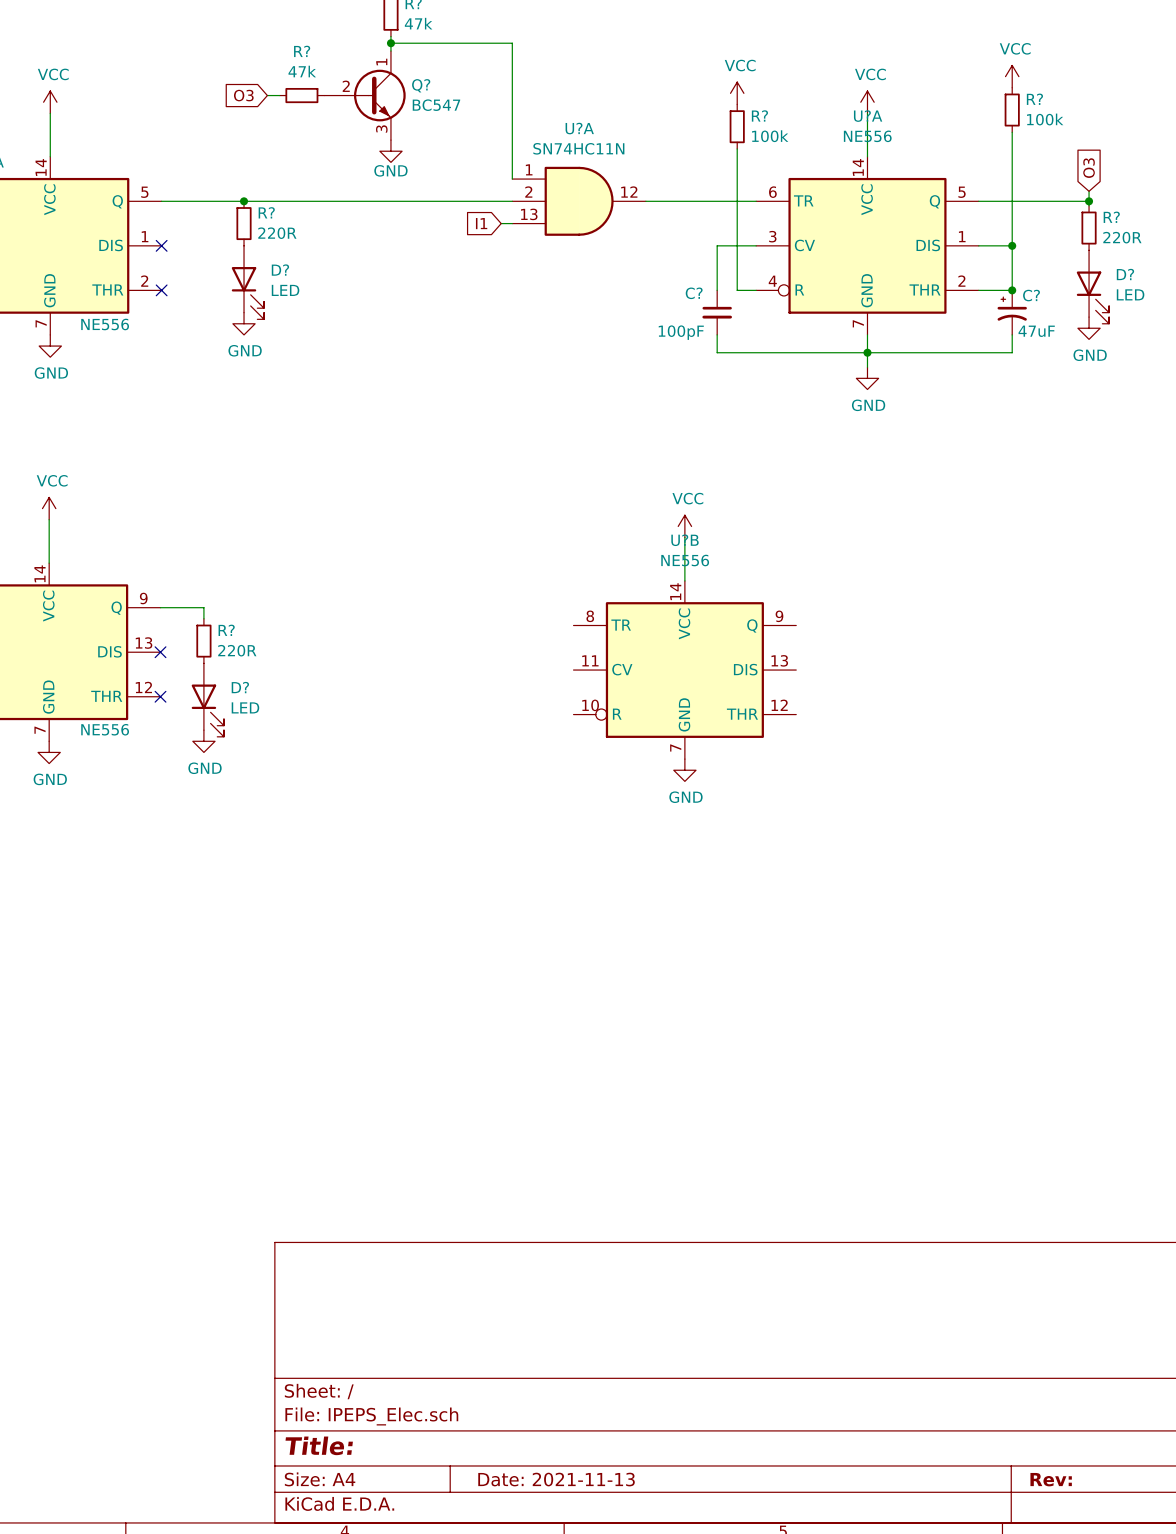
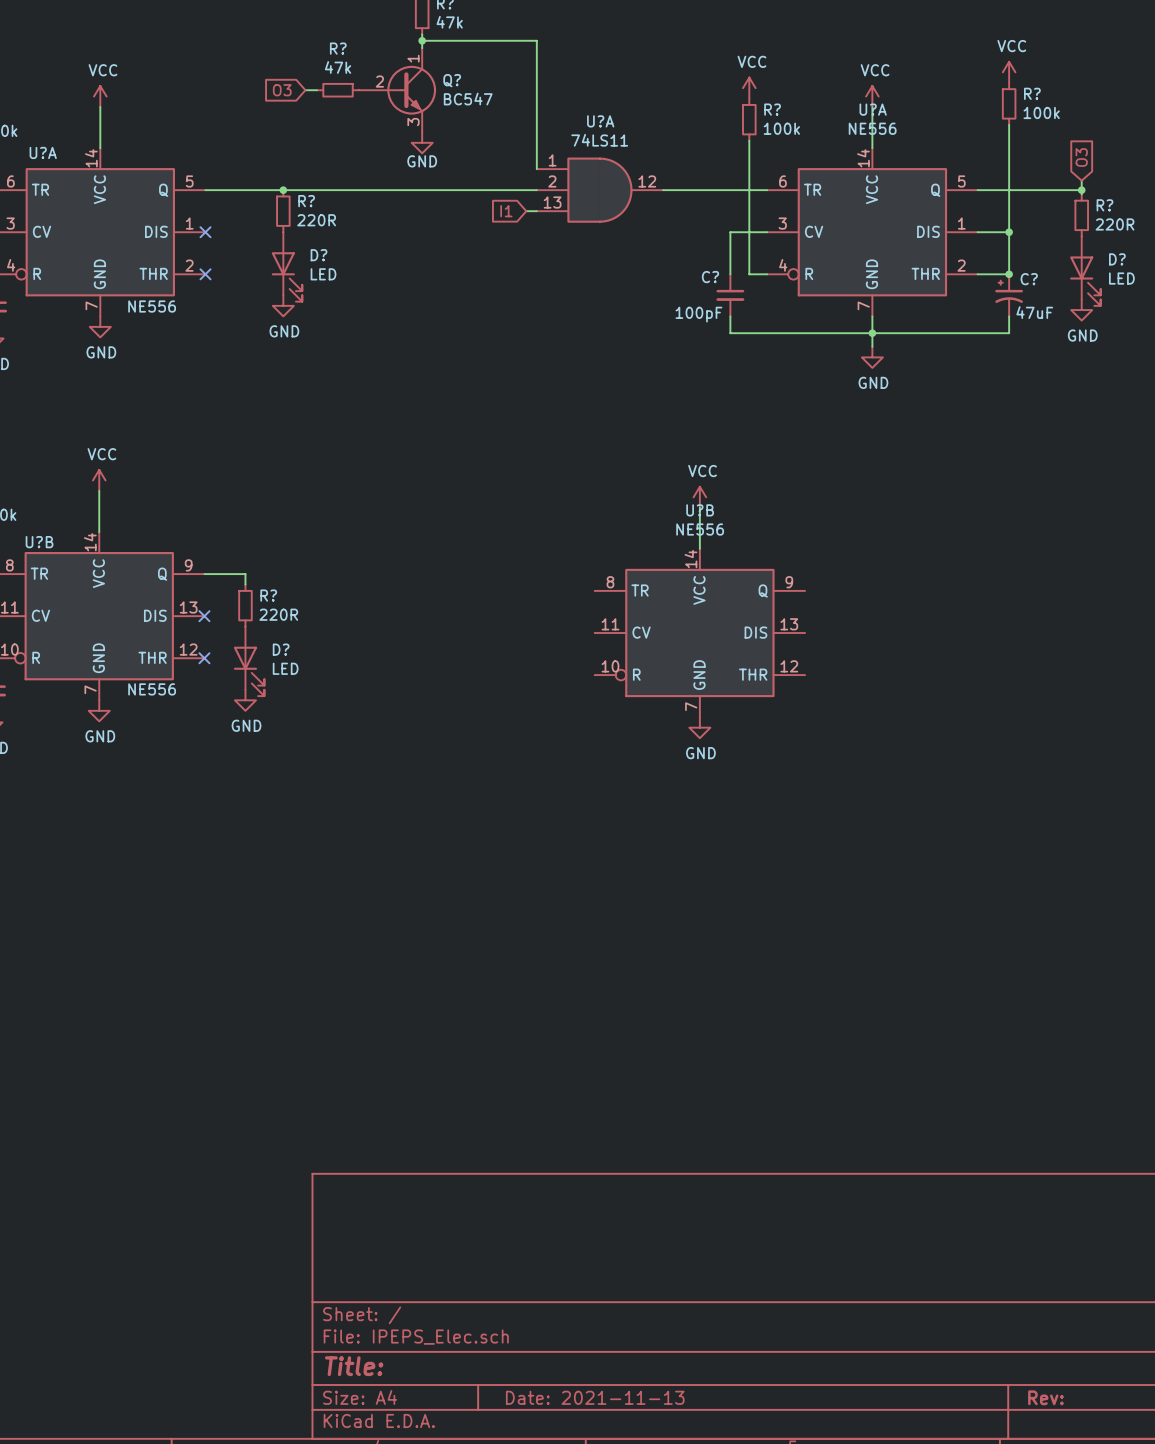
U?A value: SN74HC11N (578, 148) -> 74LS11 (599, 140)

